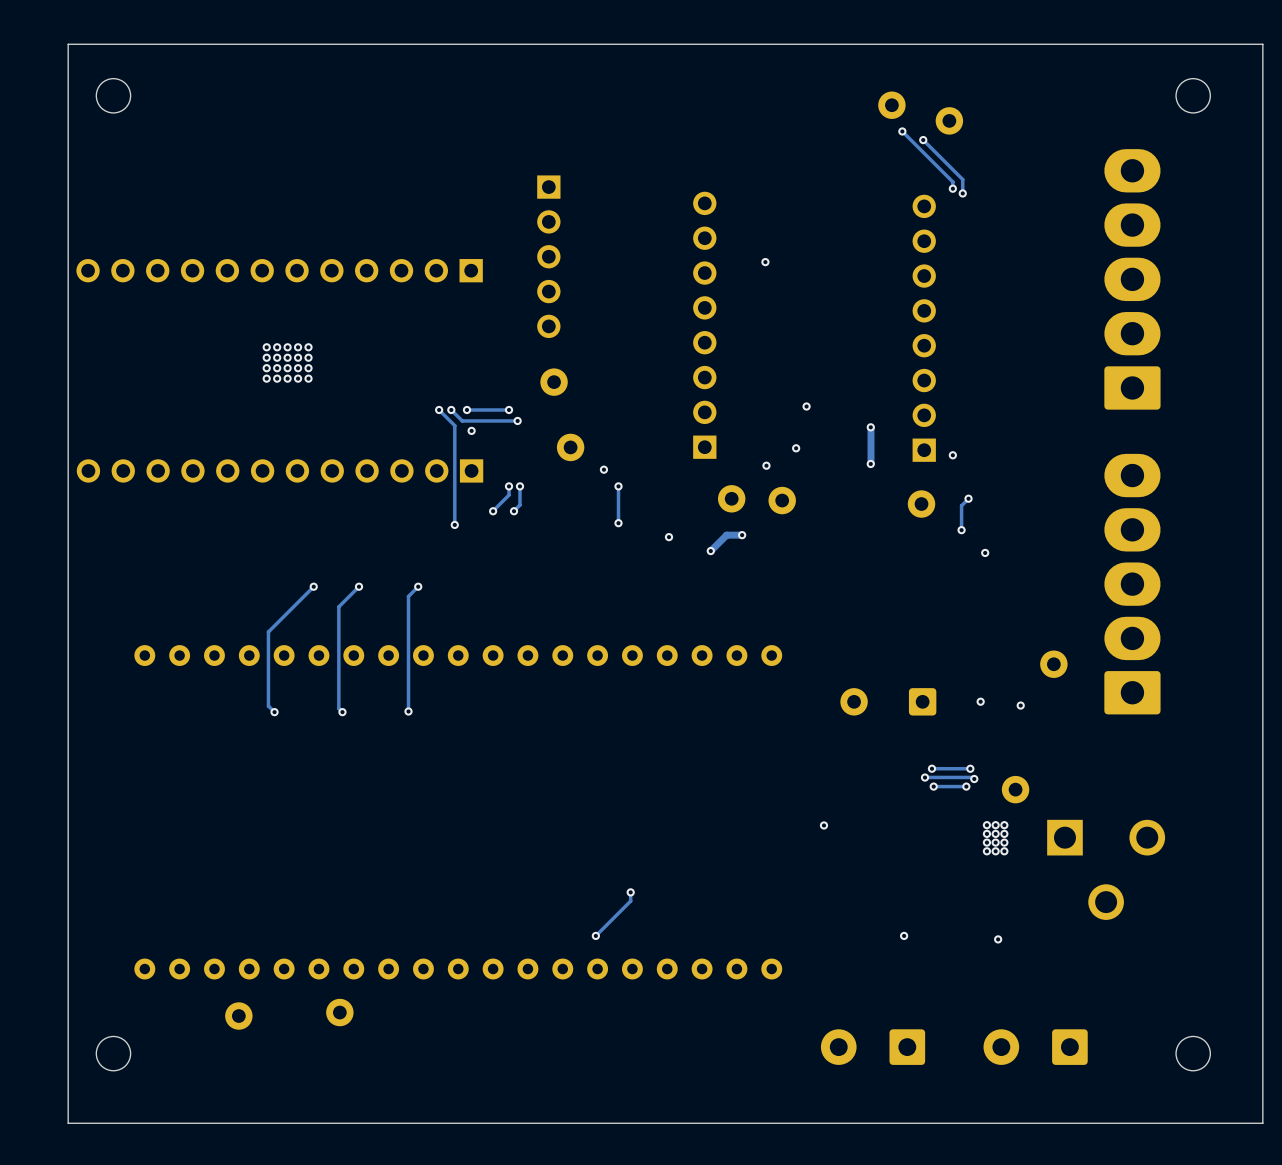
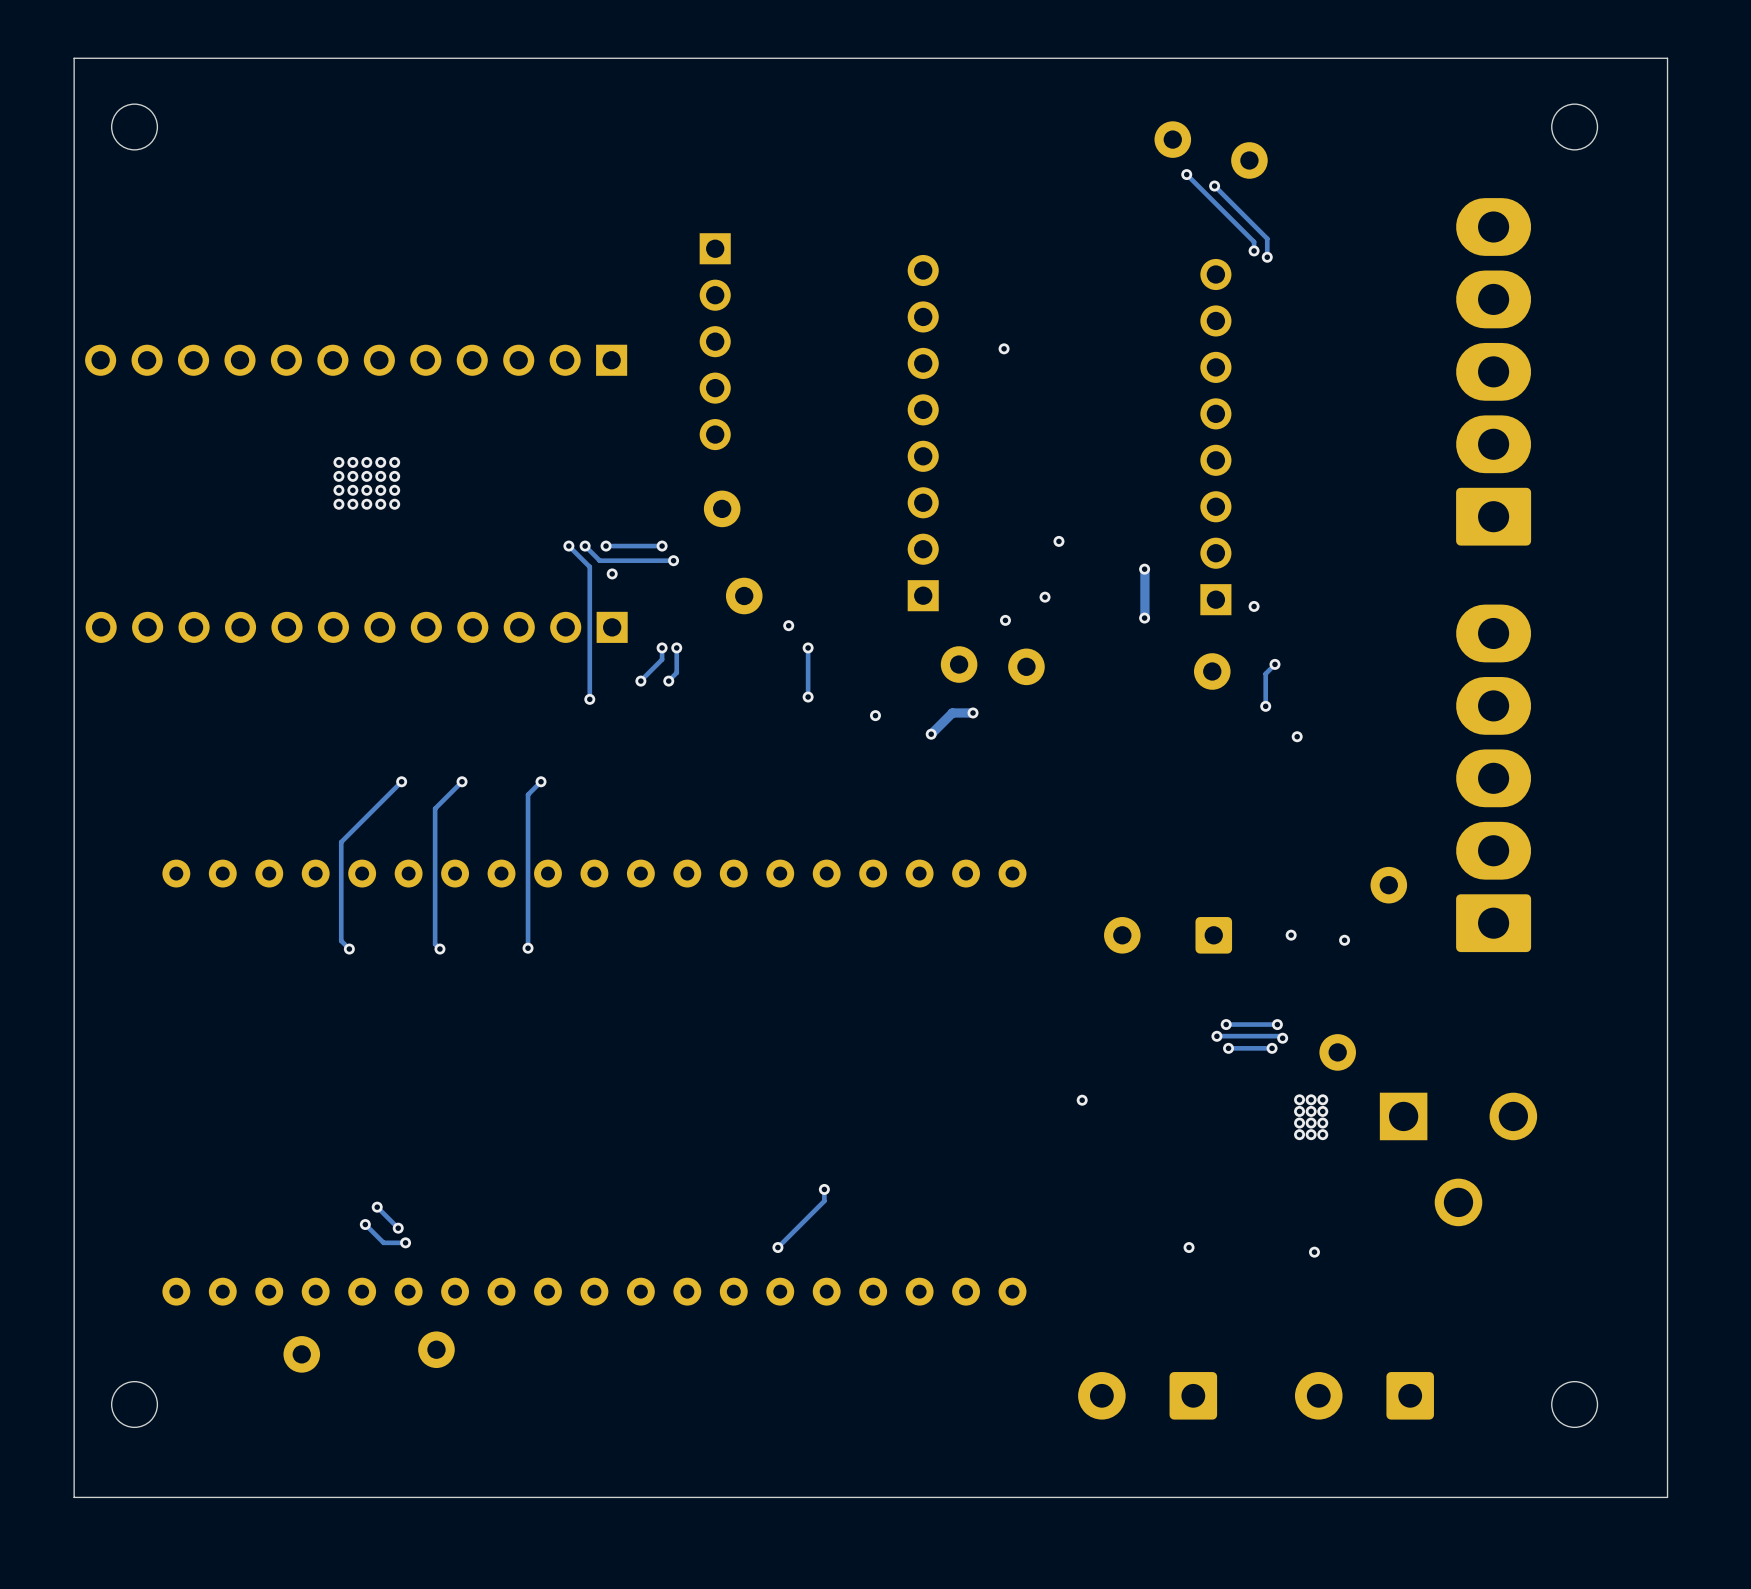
track: none -> (377, 1207) (398, 1228)
via: none -> (377, 1207)
track: none -> (365, 1224) (383, 1242) (405, 1242)
via: none -> (365, 1224)
via: none -> (398, 1228)
via: none -> (405, 1242)

